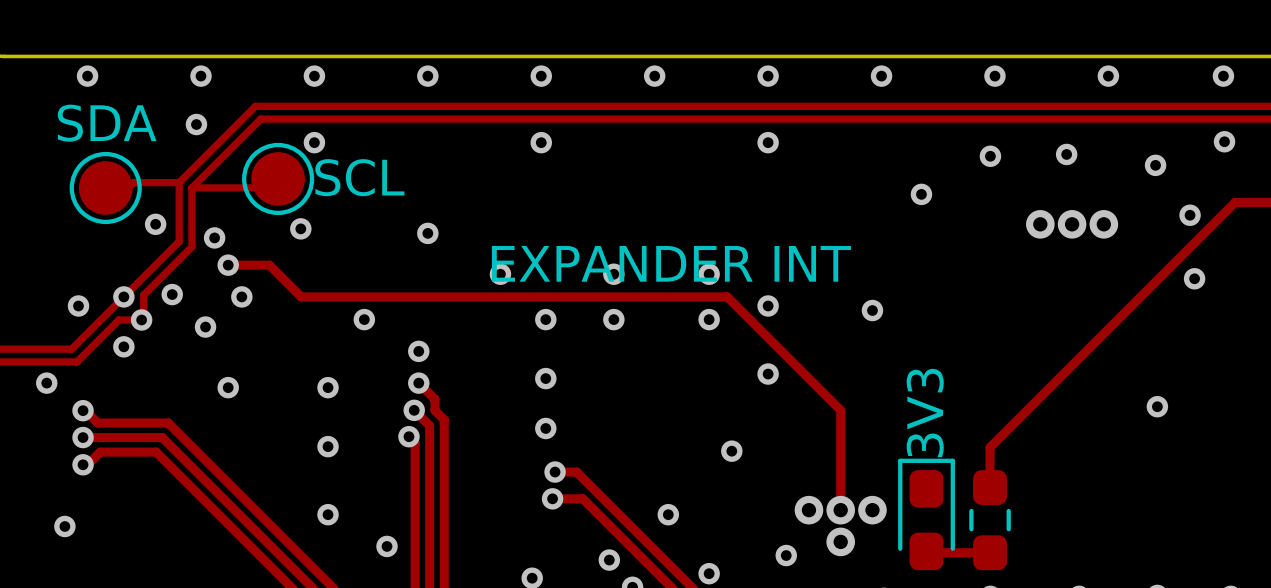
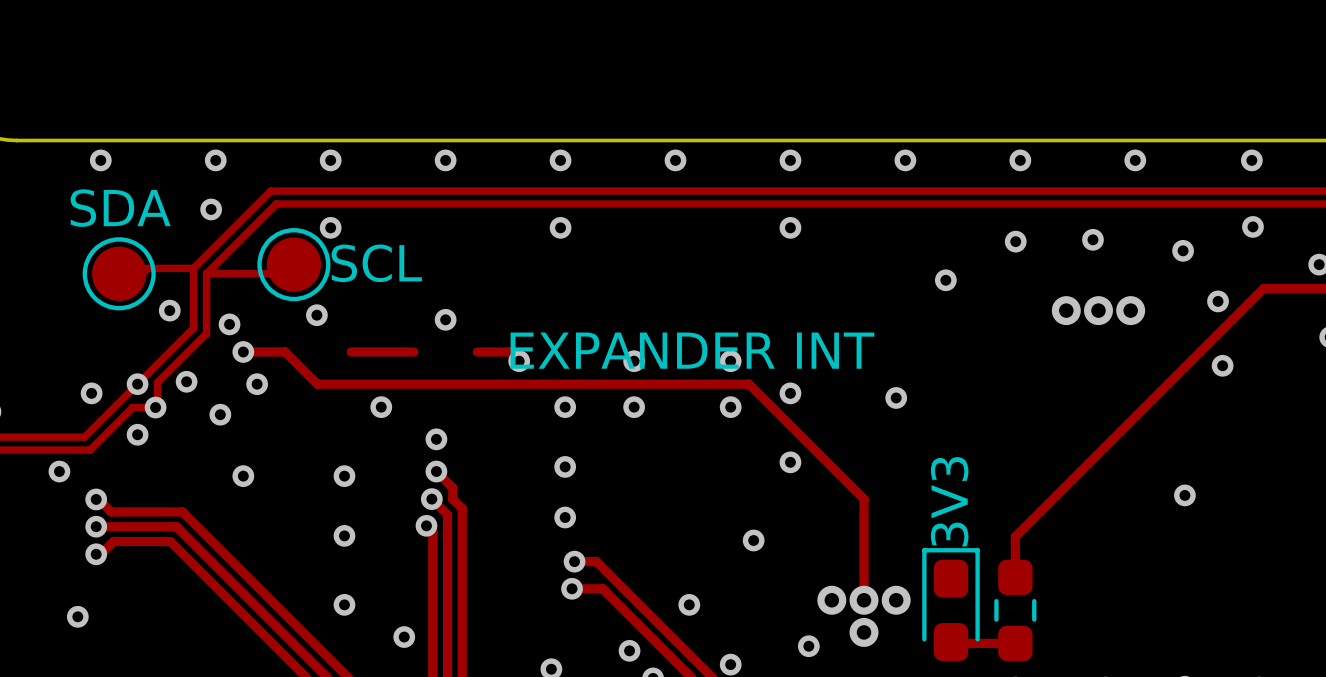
track: none -> (351, 351) (413, 351)
track: none -> (477, 351) (509, 351) (519, 361)

